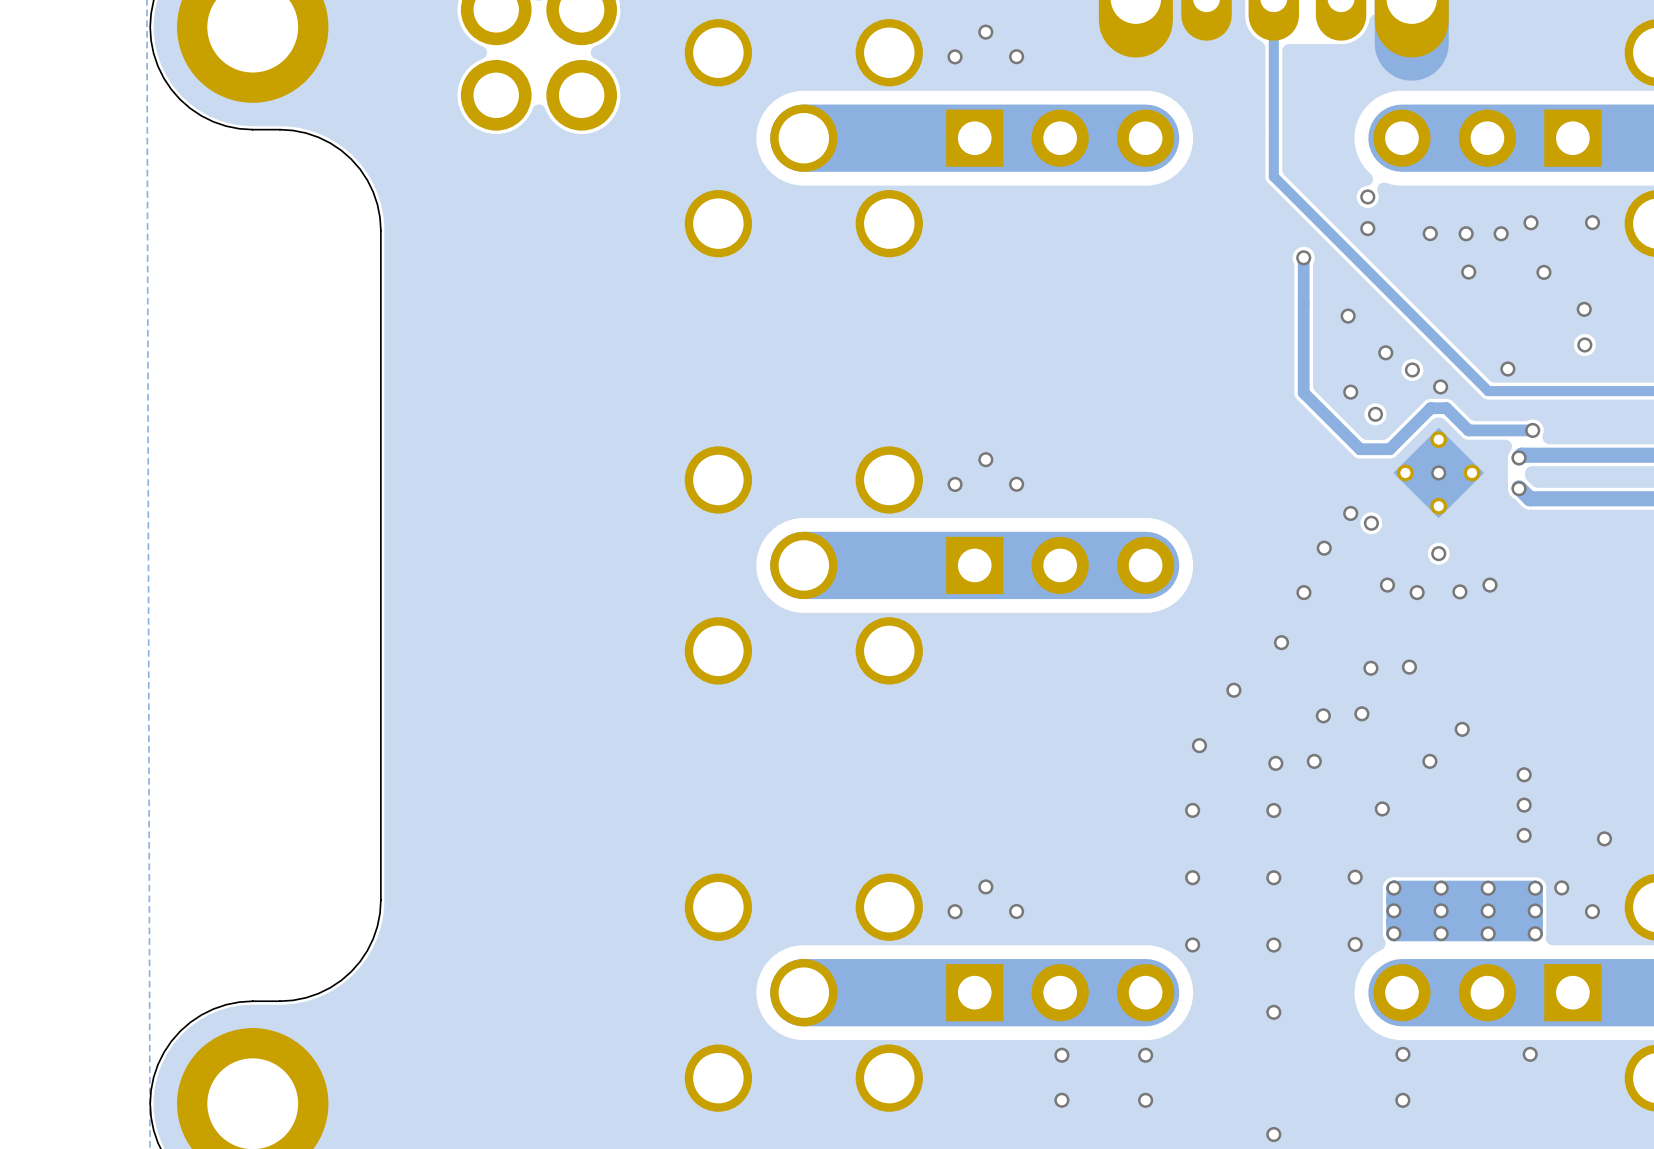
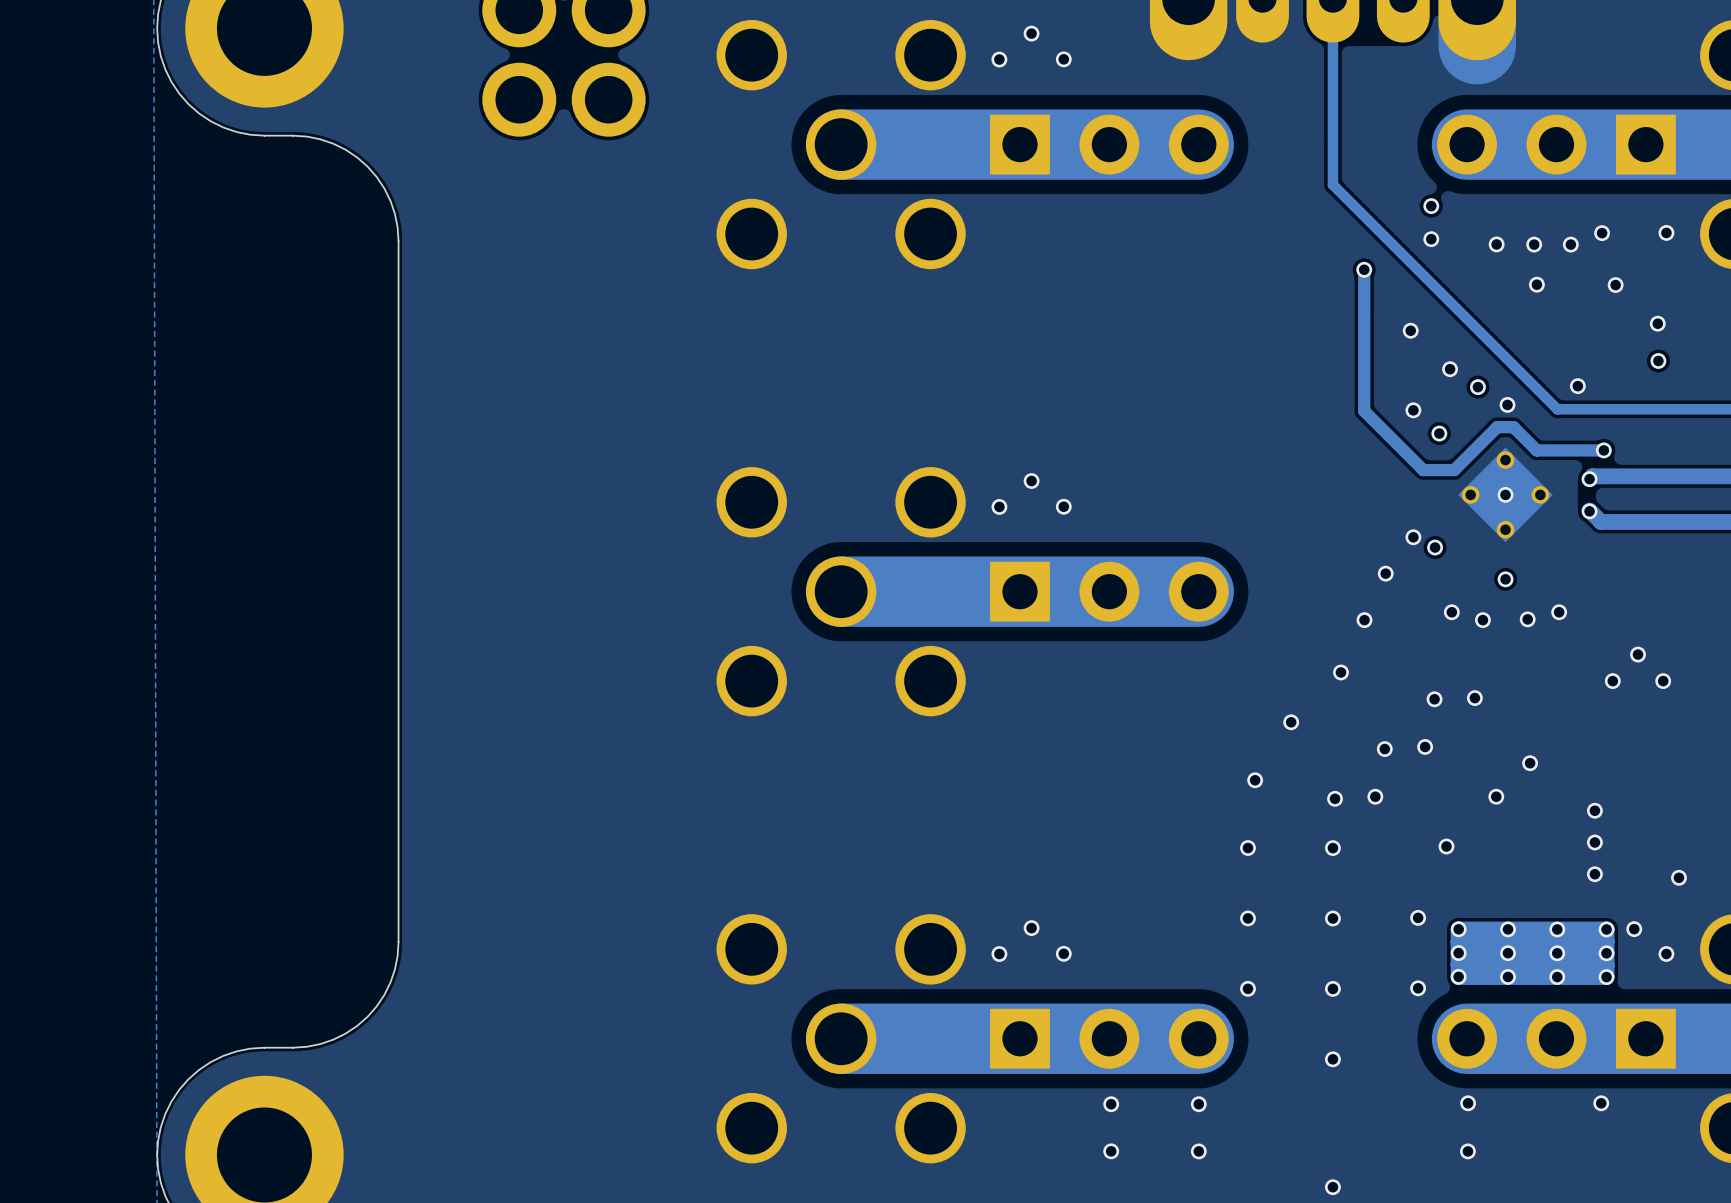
via: none -> (1638, 654)
via: none -> (1612, 681)
via: none -> (1663, 681)

